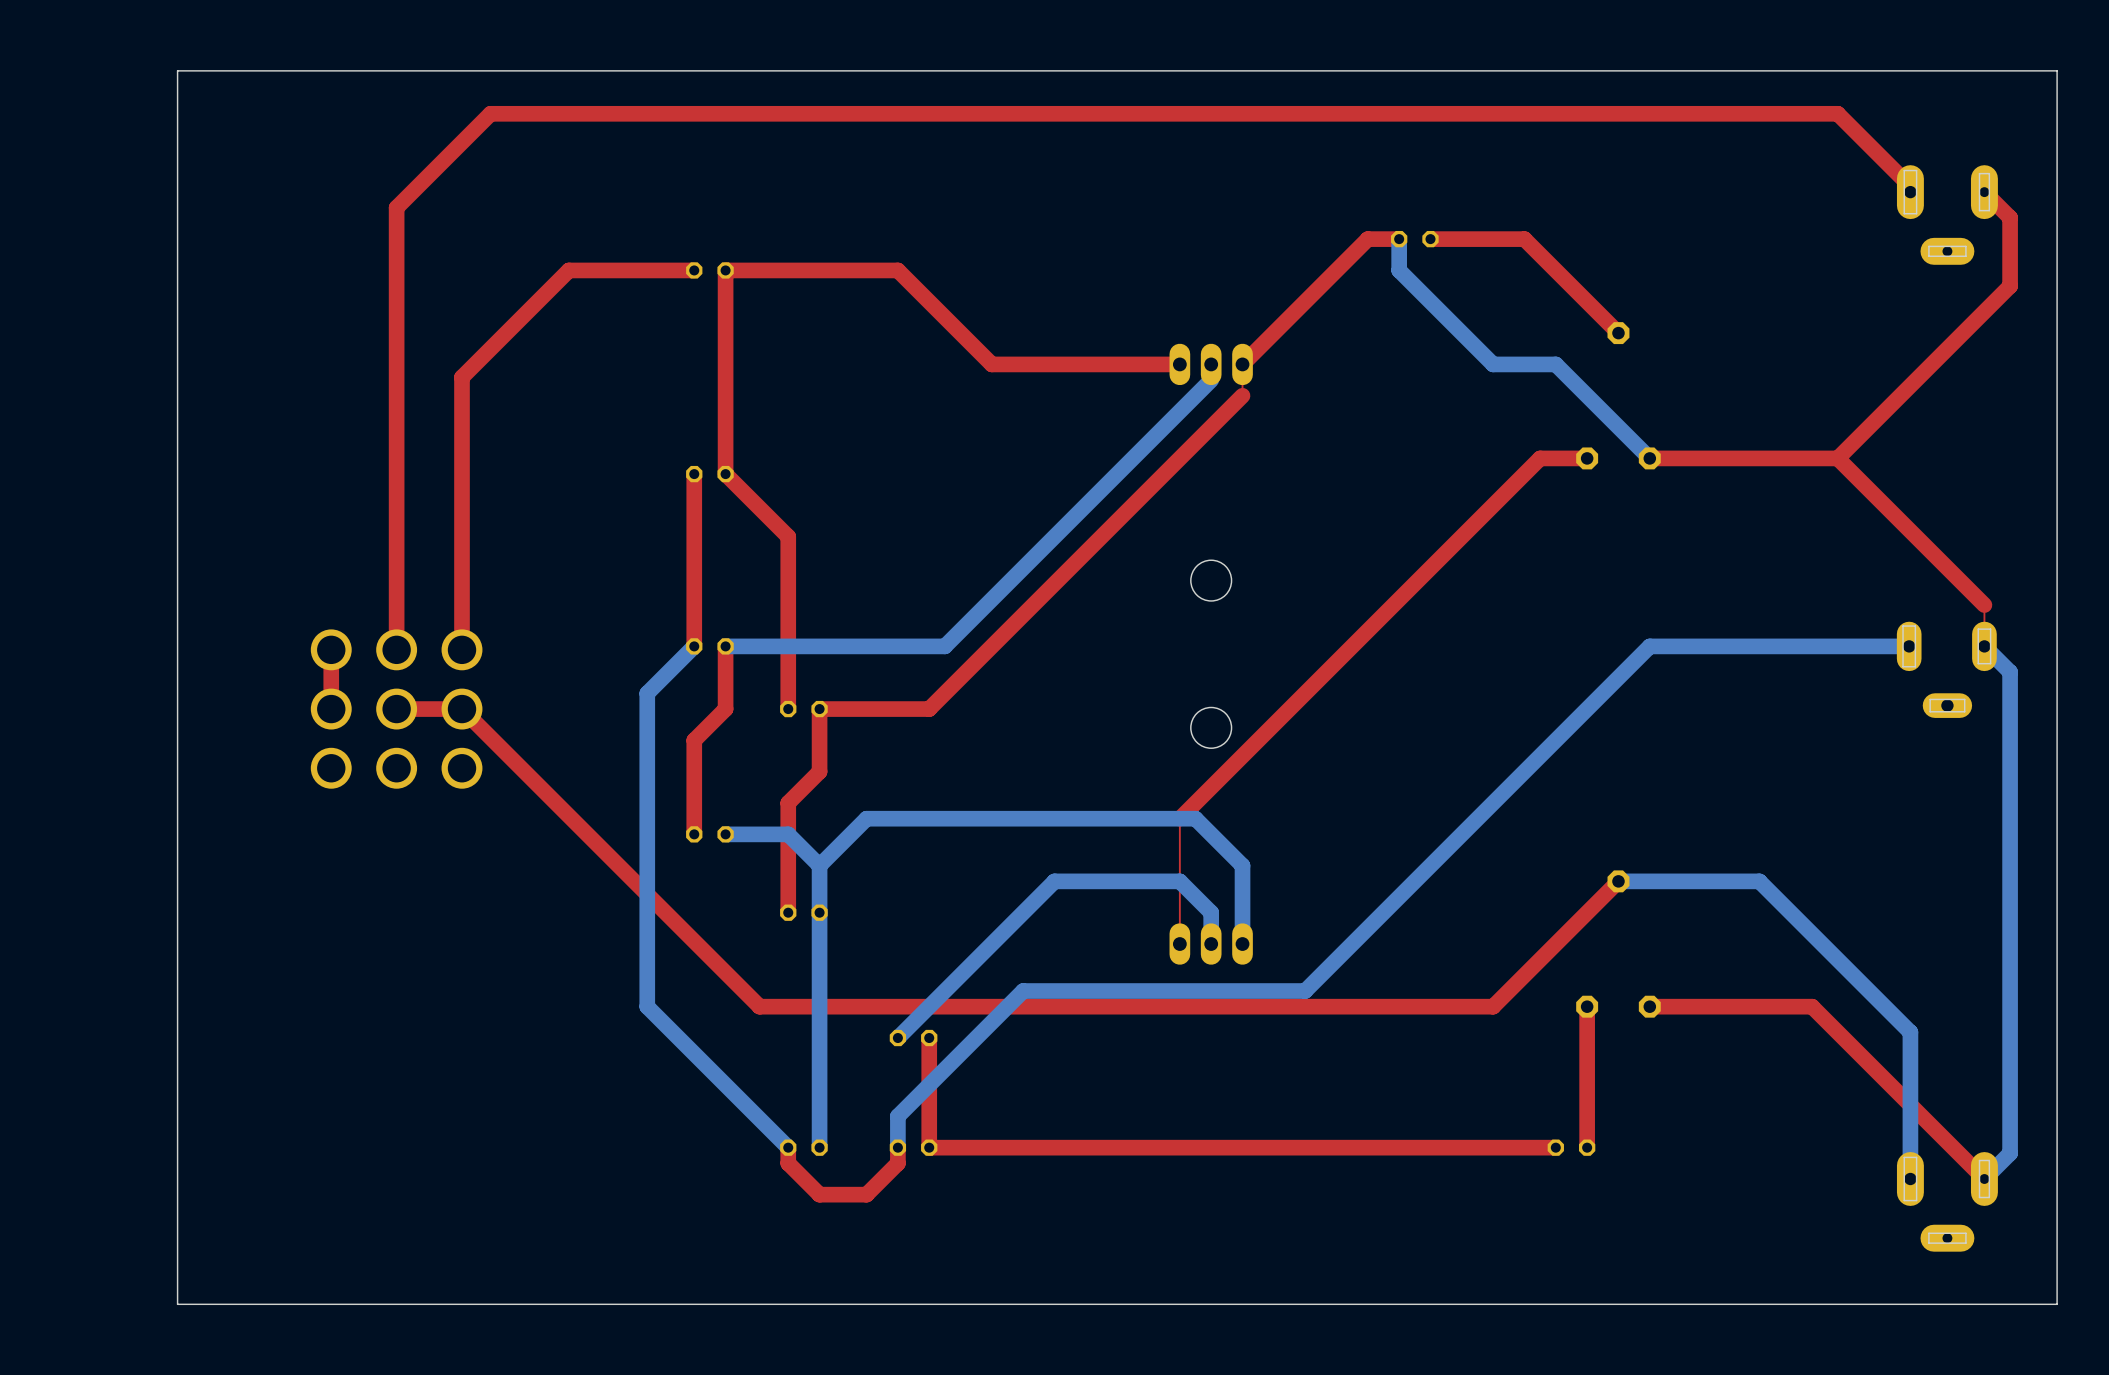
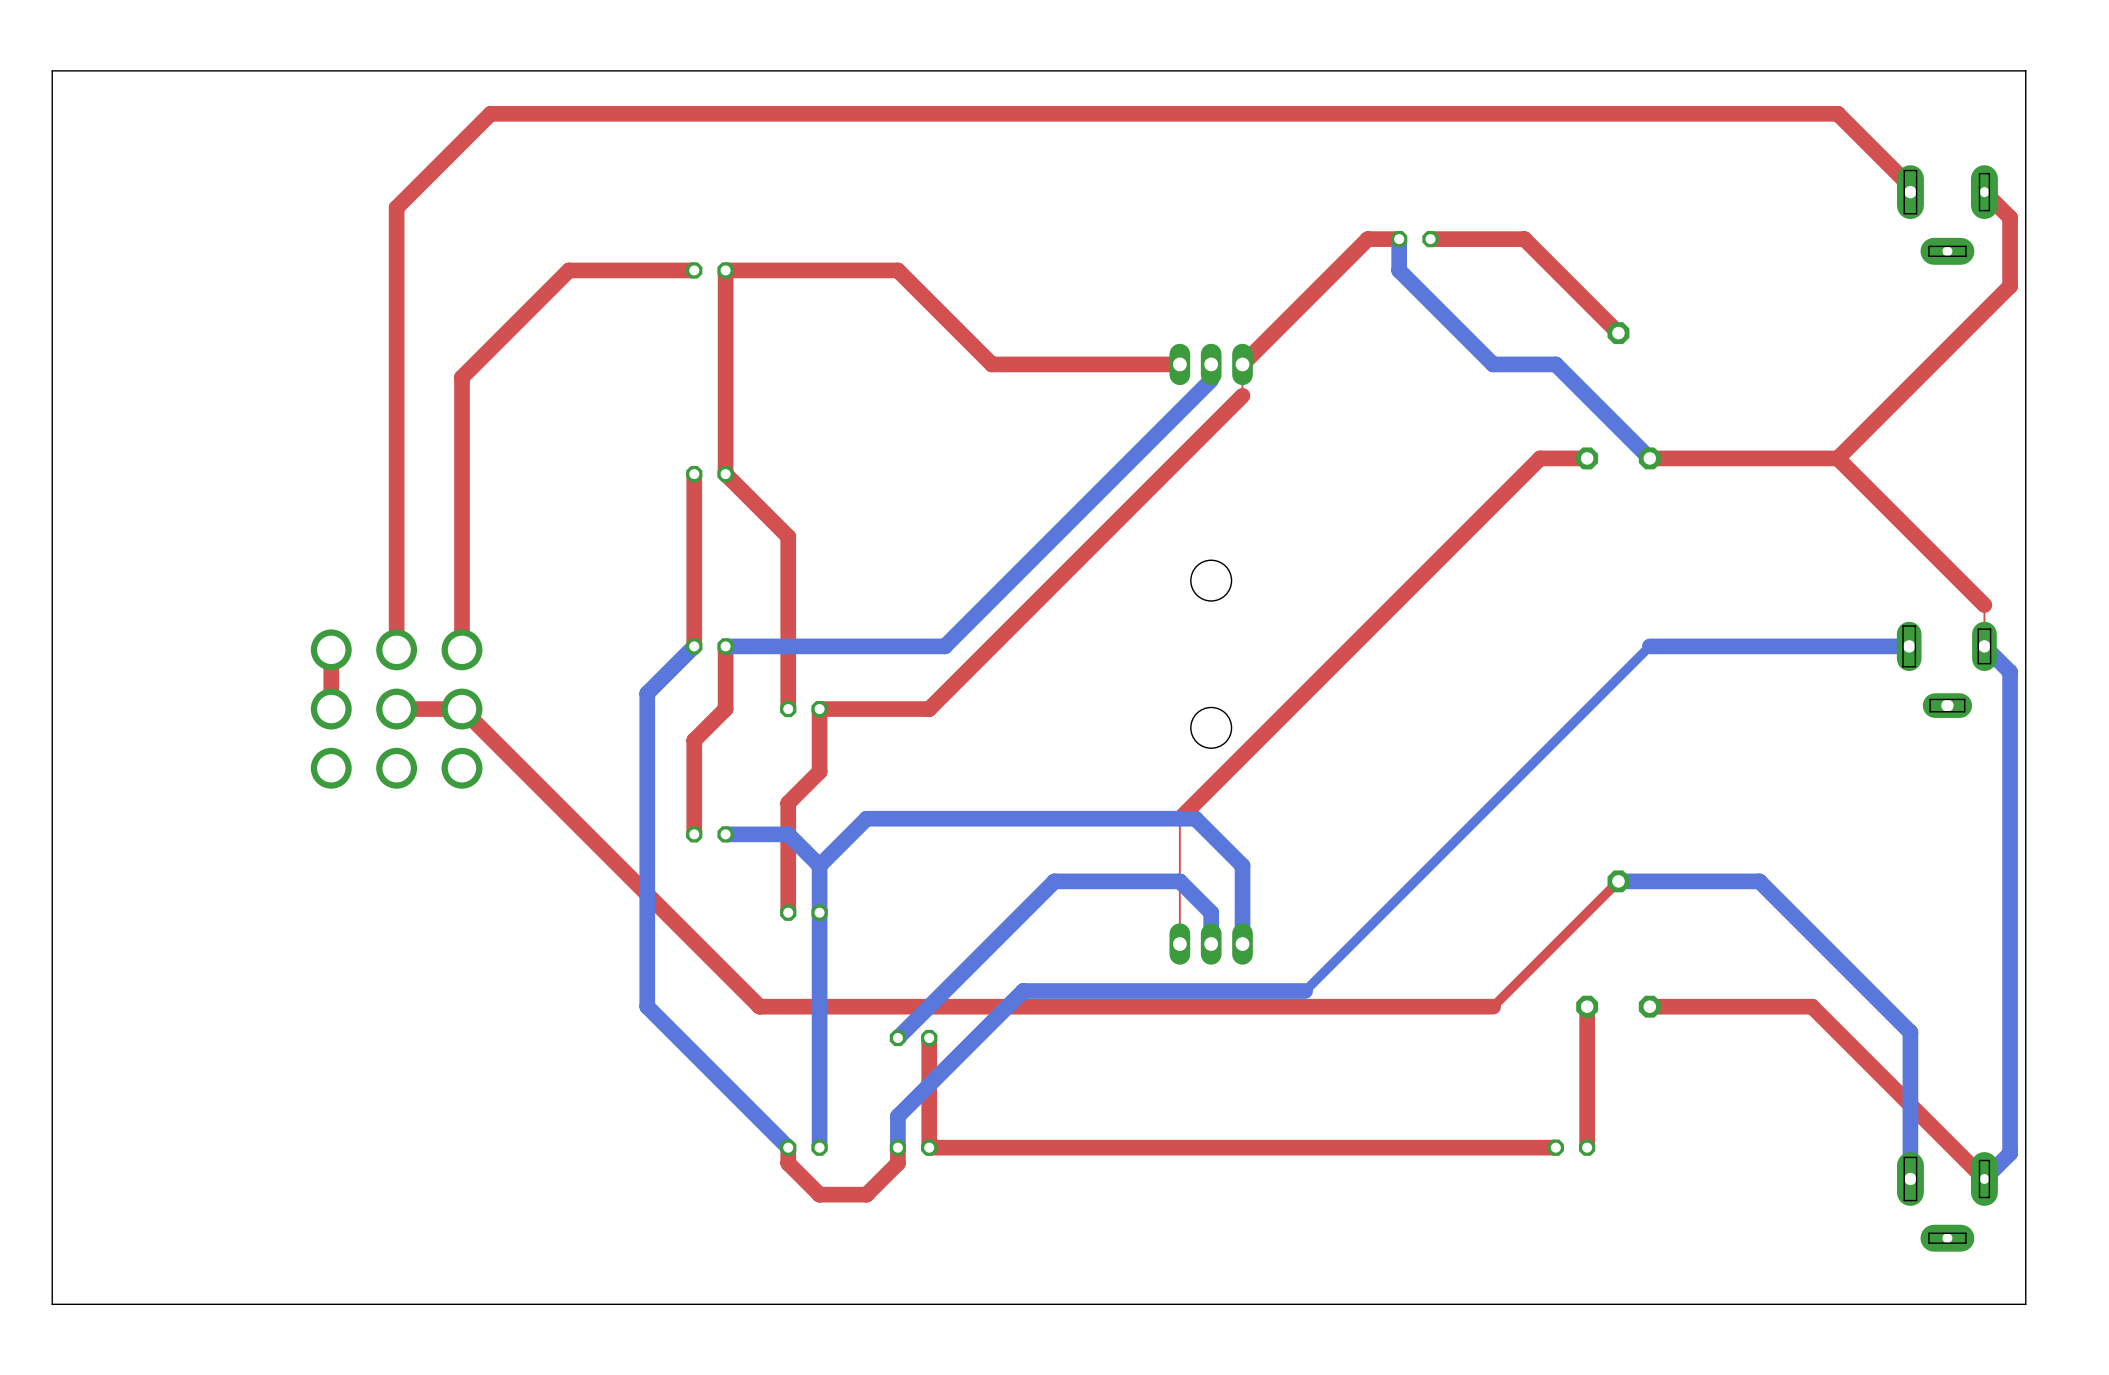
board edge: (177, 70) (177, 1304) -> (177, 70) (52, 70) (52, 1304) (177, 1304)
board edge: (2025, 70) (2057, 70) (2057, 1304) (2025, 1304) -> (2025, 70) (2025, 1304)
bottom track width: thick (1649, 646) (1305, 991) -> thin (1649, 646) (1305, 991)
top track width: thick (1618, 881) (1493, 1006) -> thin (1618, 881) (1493, 1006)

